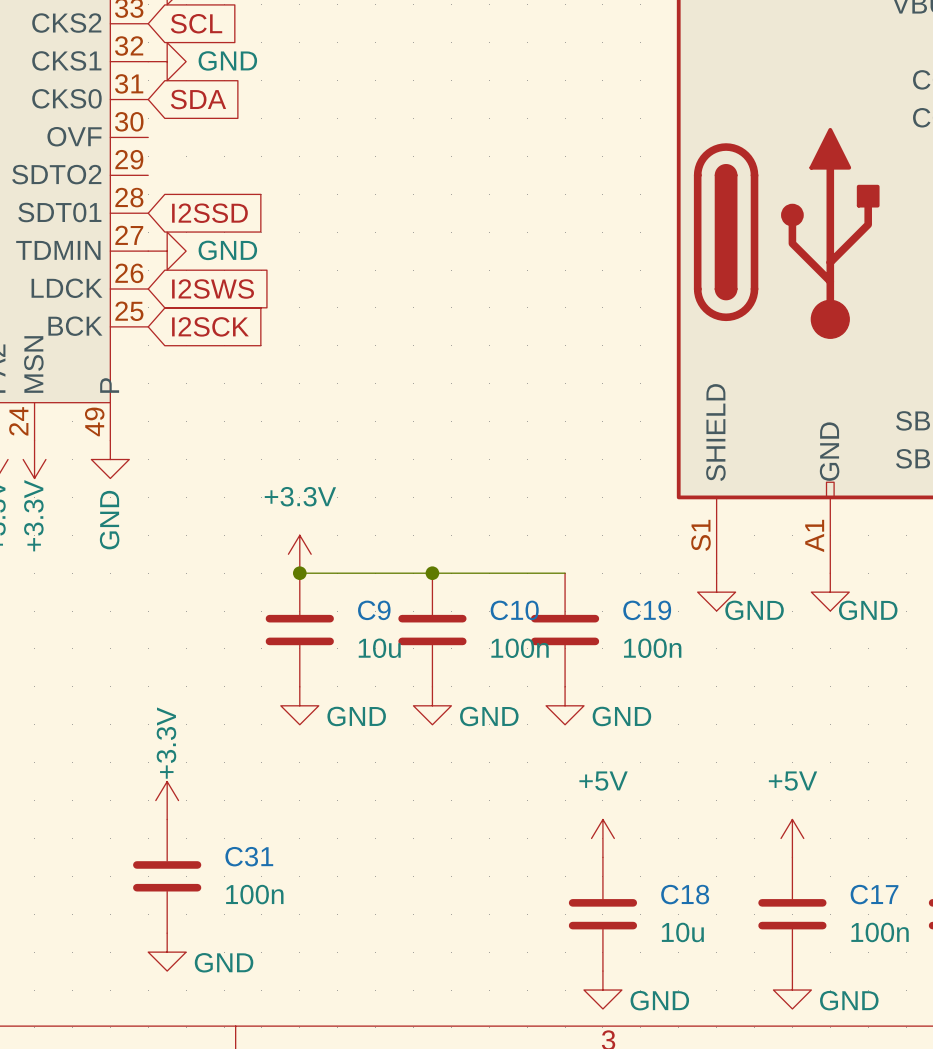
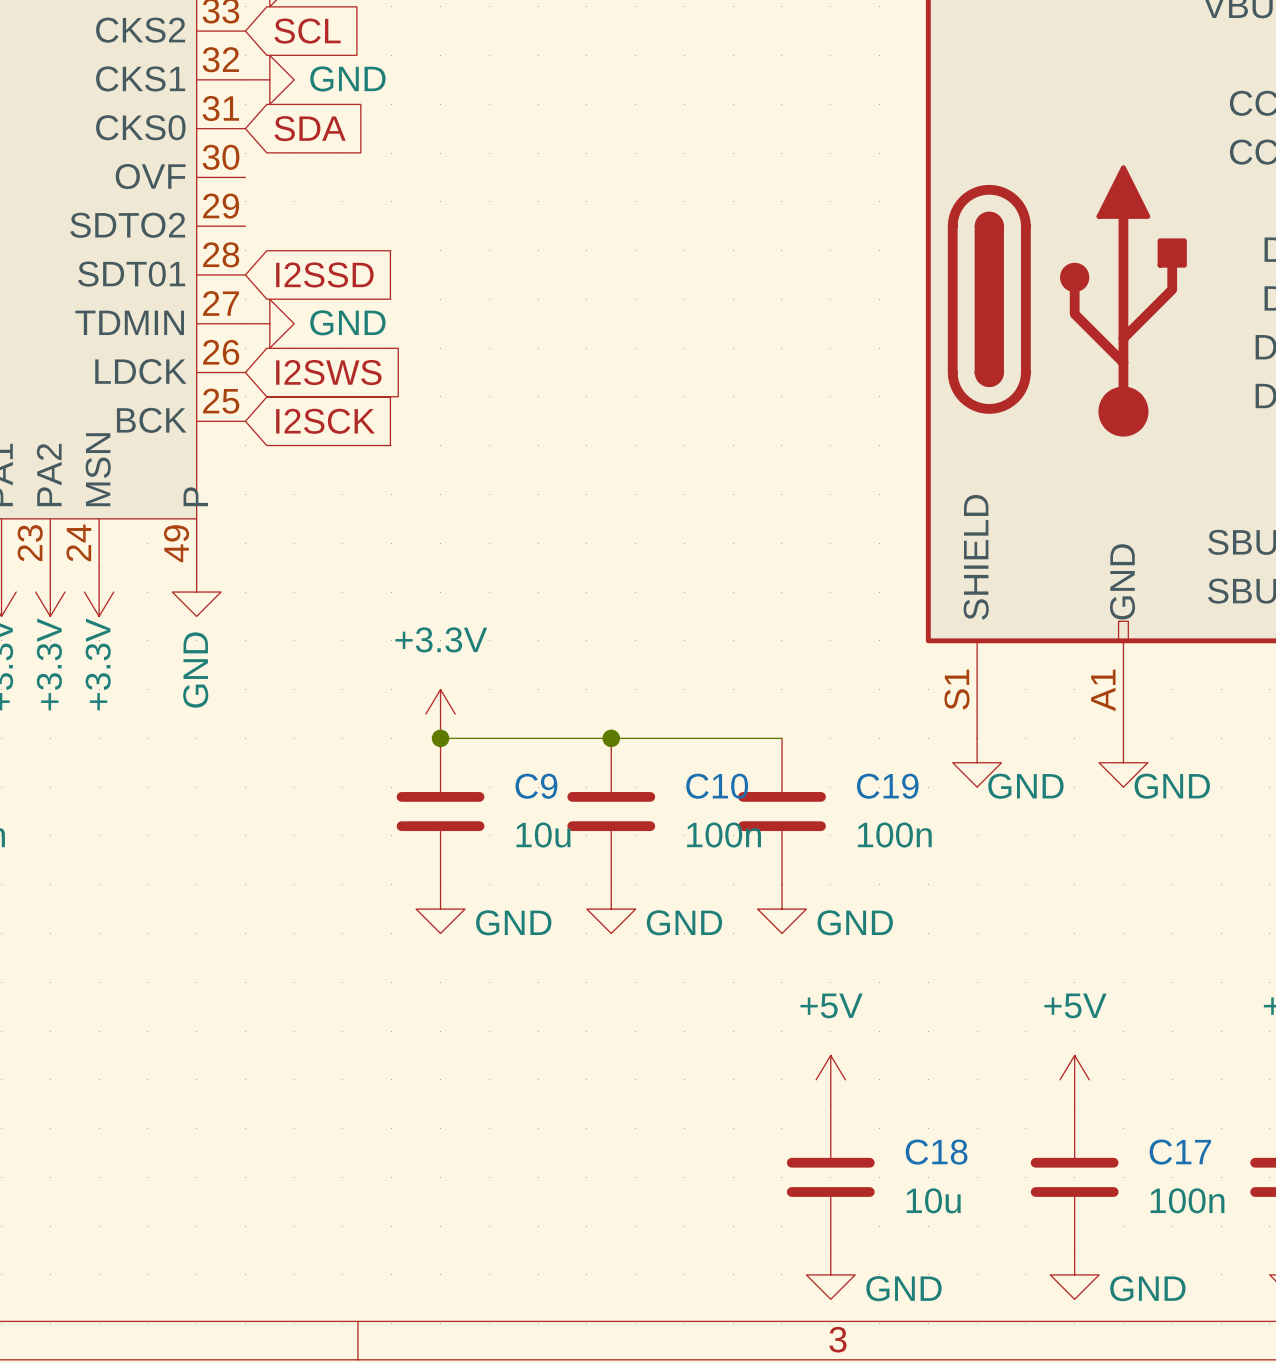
power symbol: +3.3V (167, 800) -> none
C31: 100n (167, 876) -> none
power symbol: GND (167, 952) -> none

